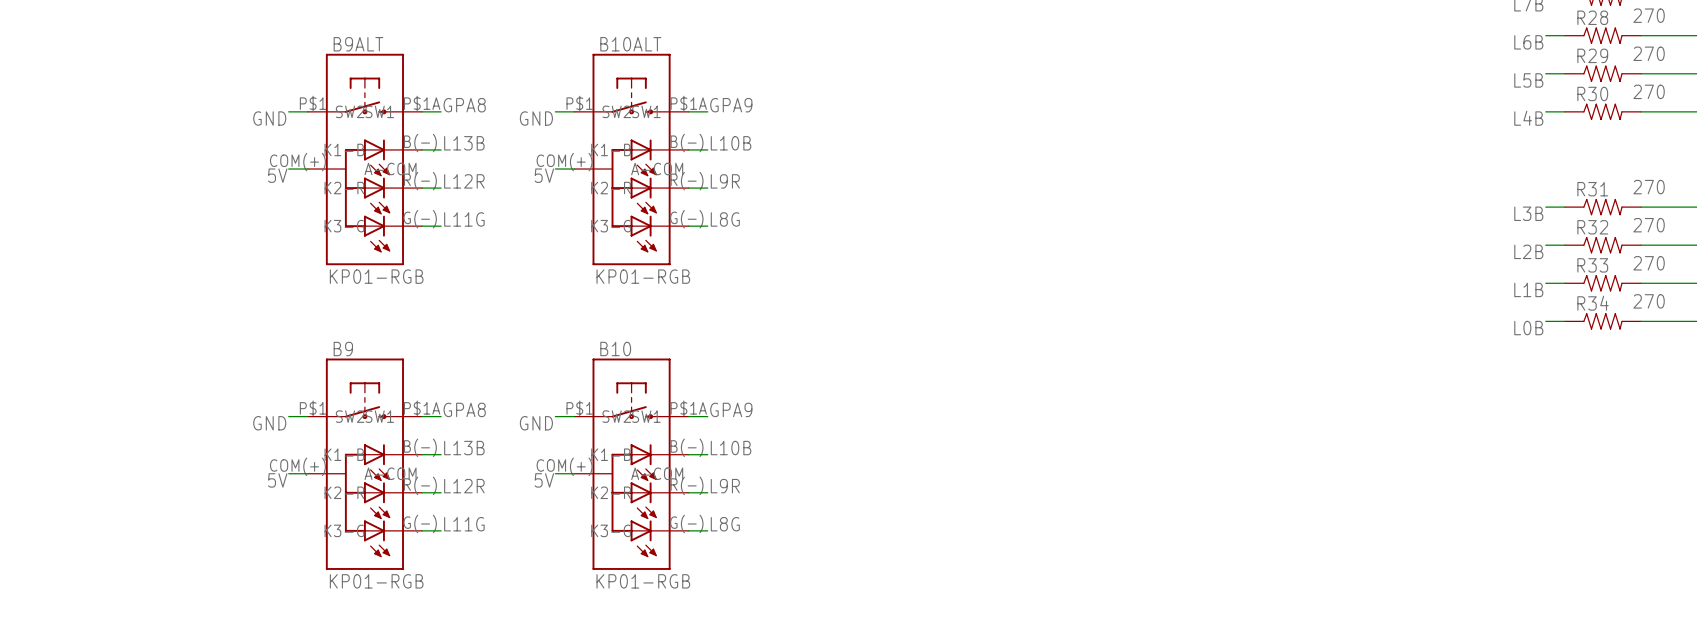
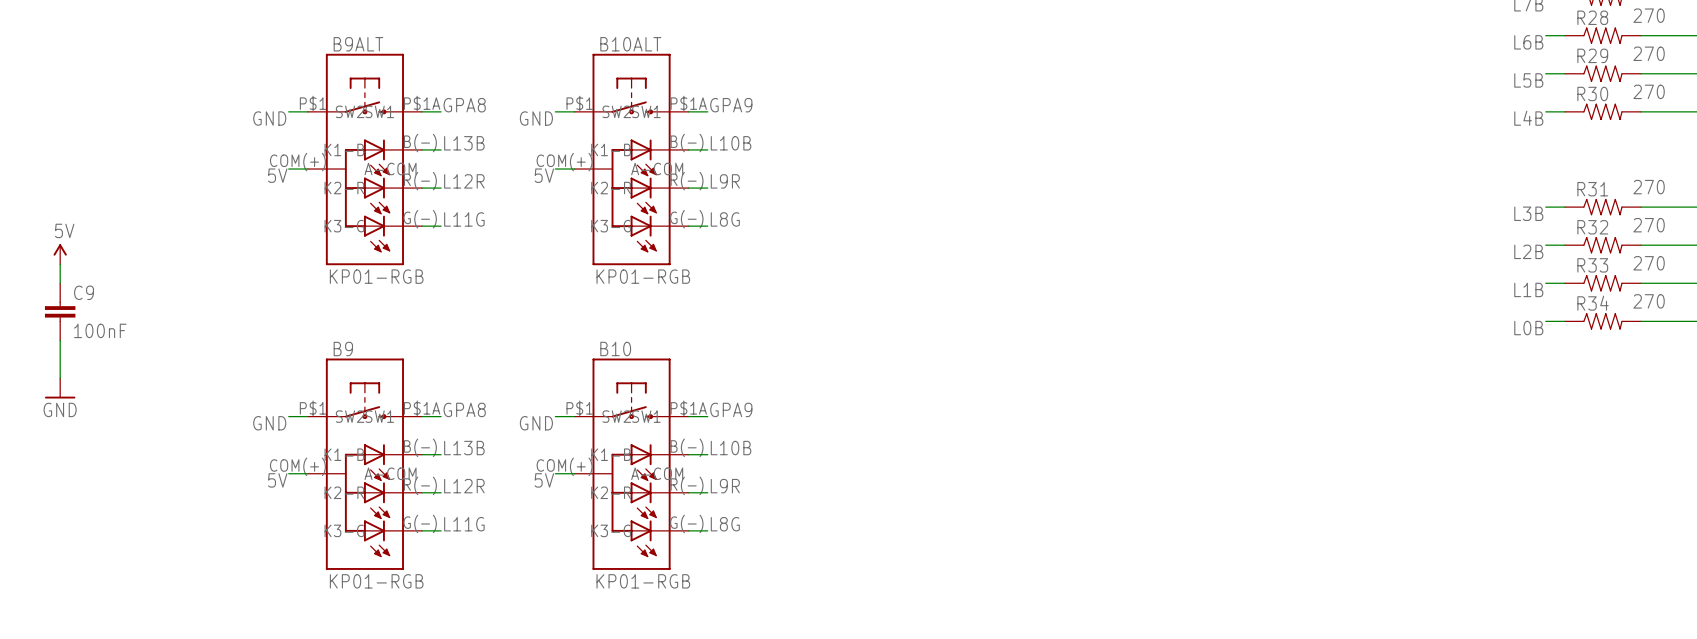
power symbol: none -> 5V (60, 254)
wire: none -> (60, 264) (60, 283)
C9: none -> 100nF (60, 311)
wire: none -> (60, 340) (60, 378)
power symbol: none -> GND (60, 388)

